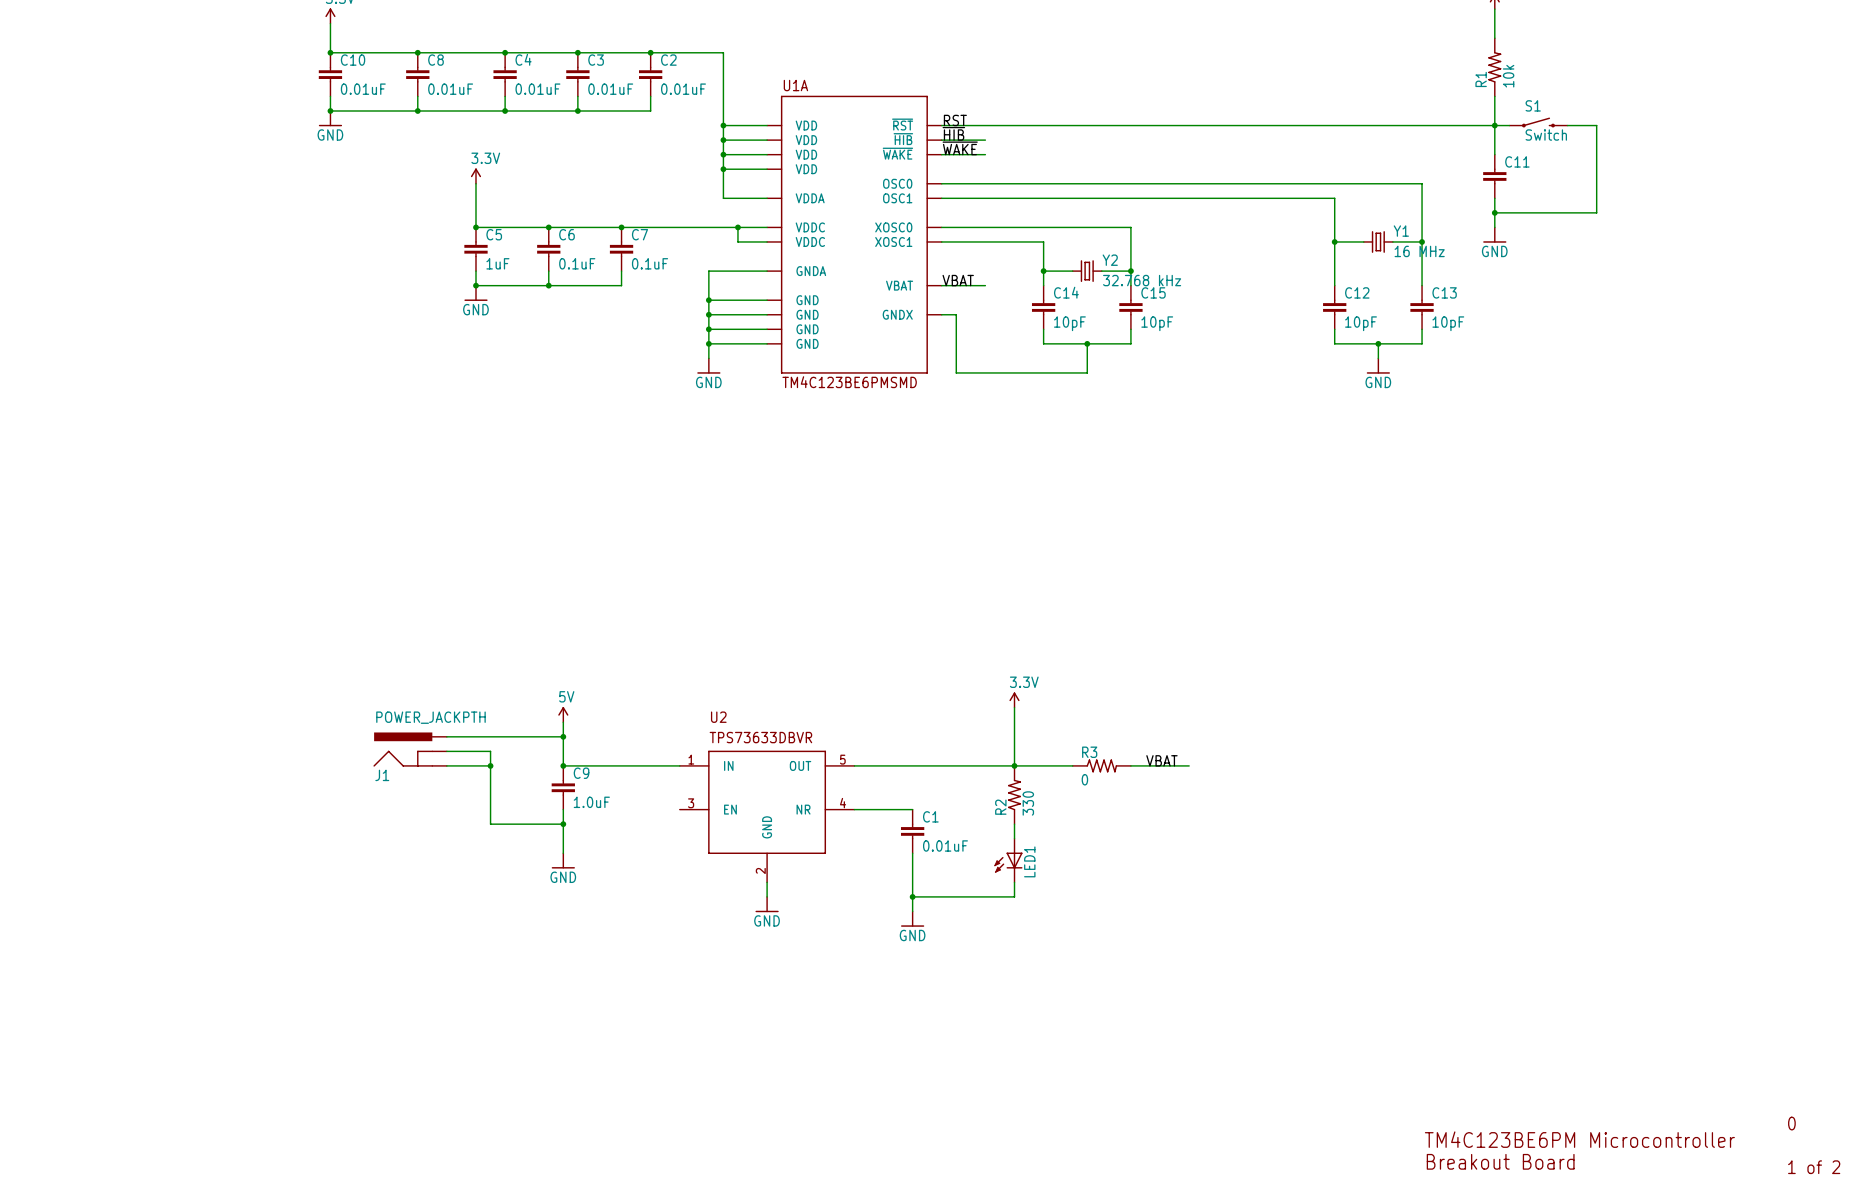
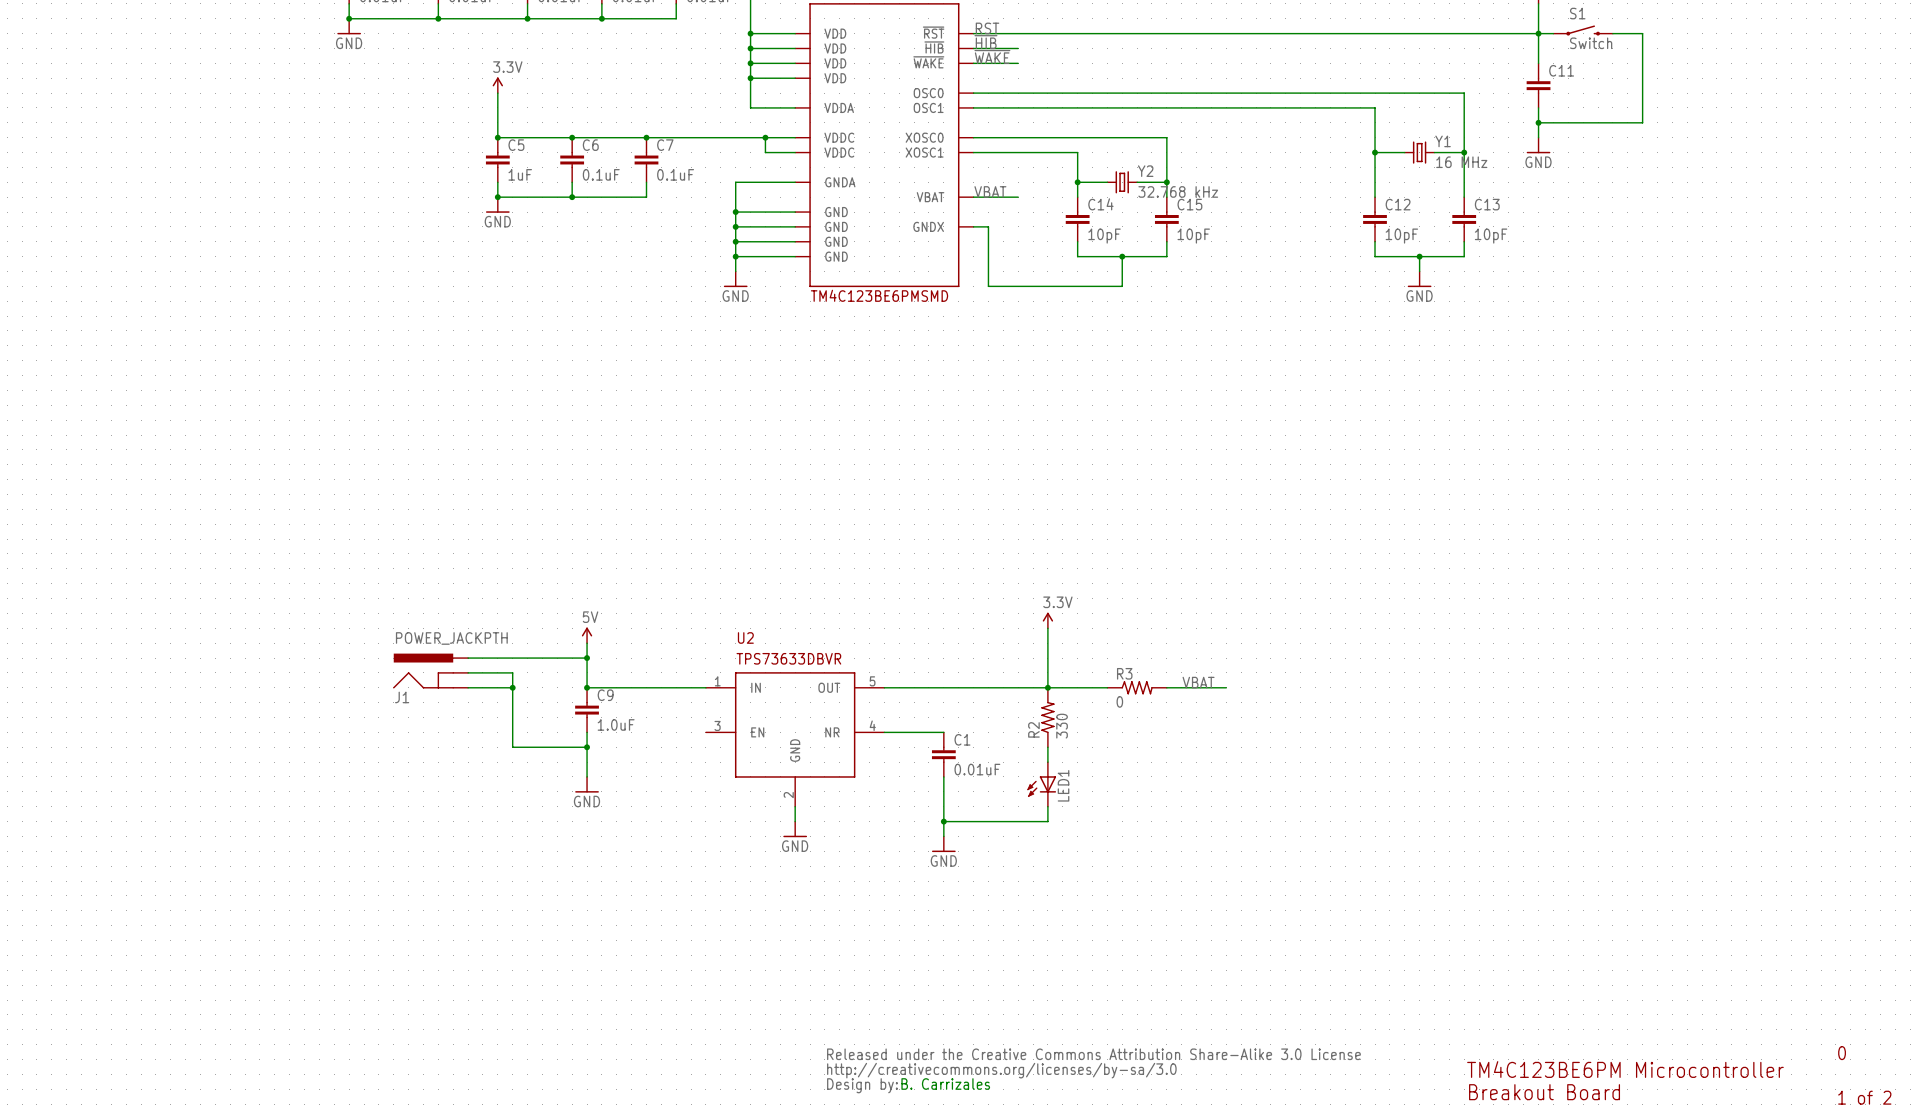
part: none -> (1093, 1070)
text: none -> B. Carrizales (945, 1084)

